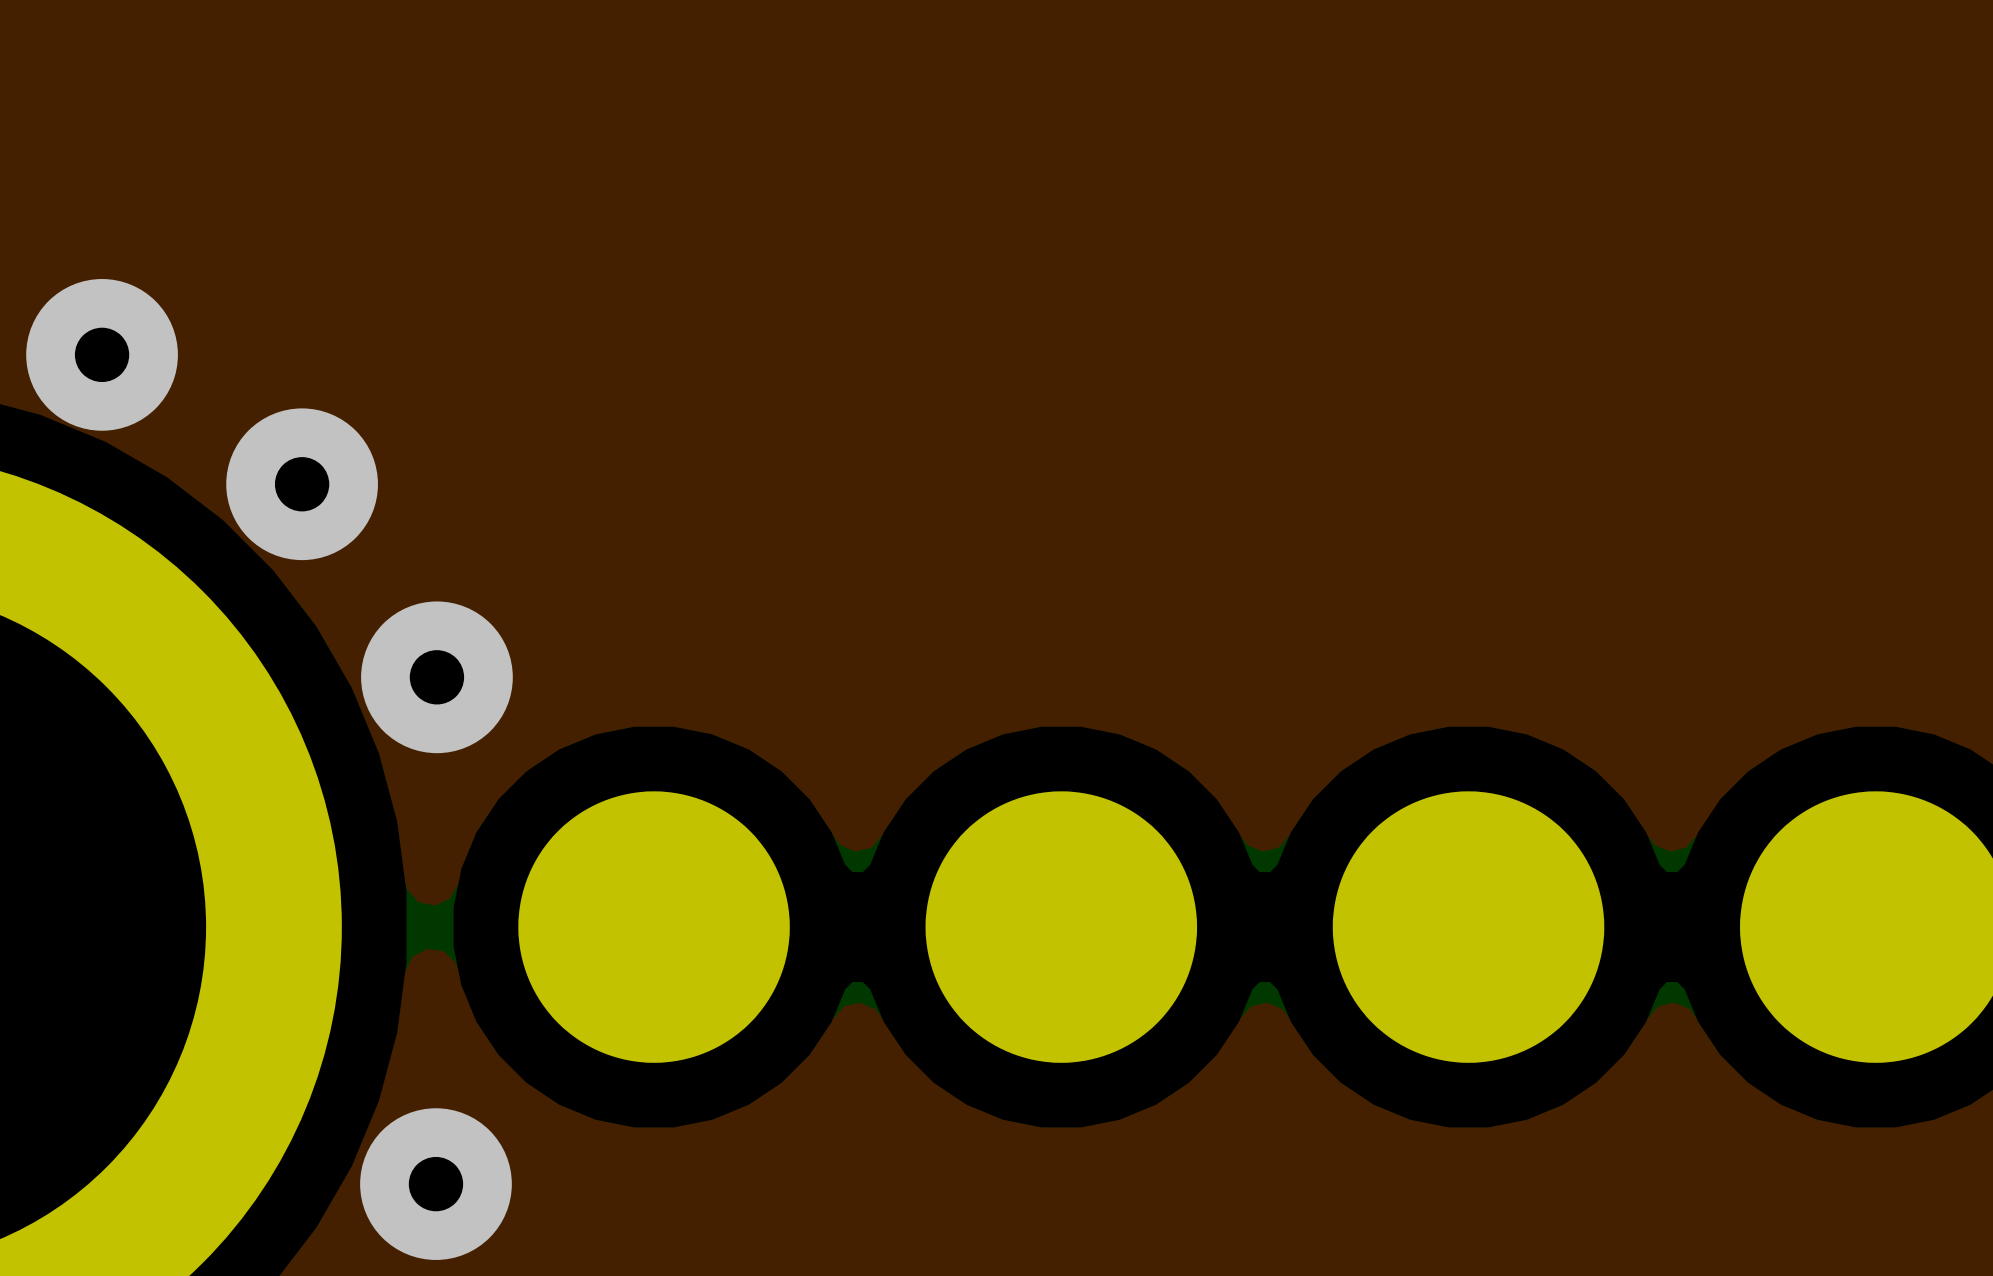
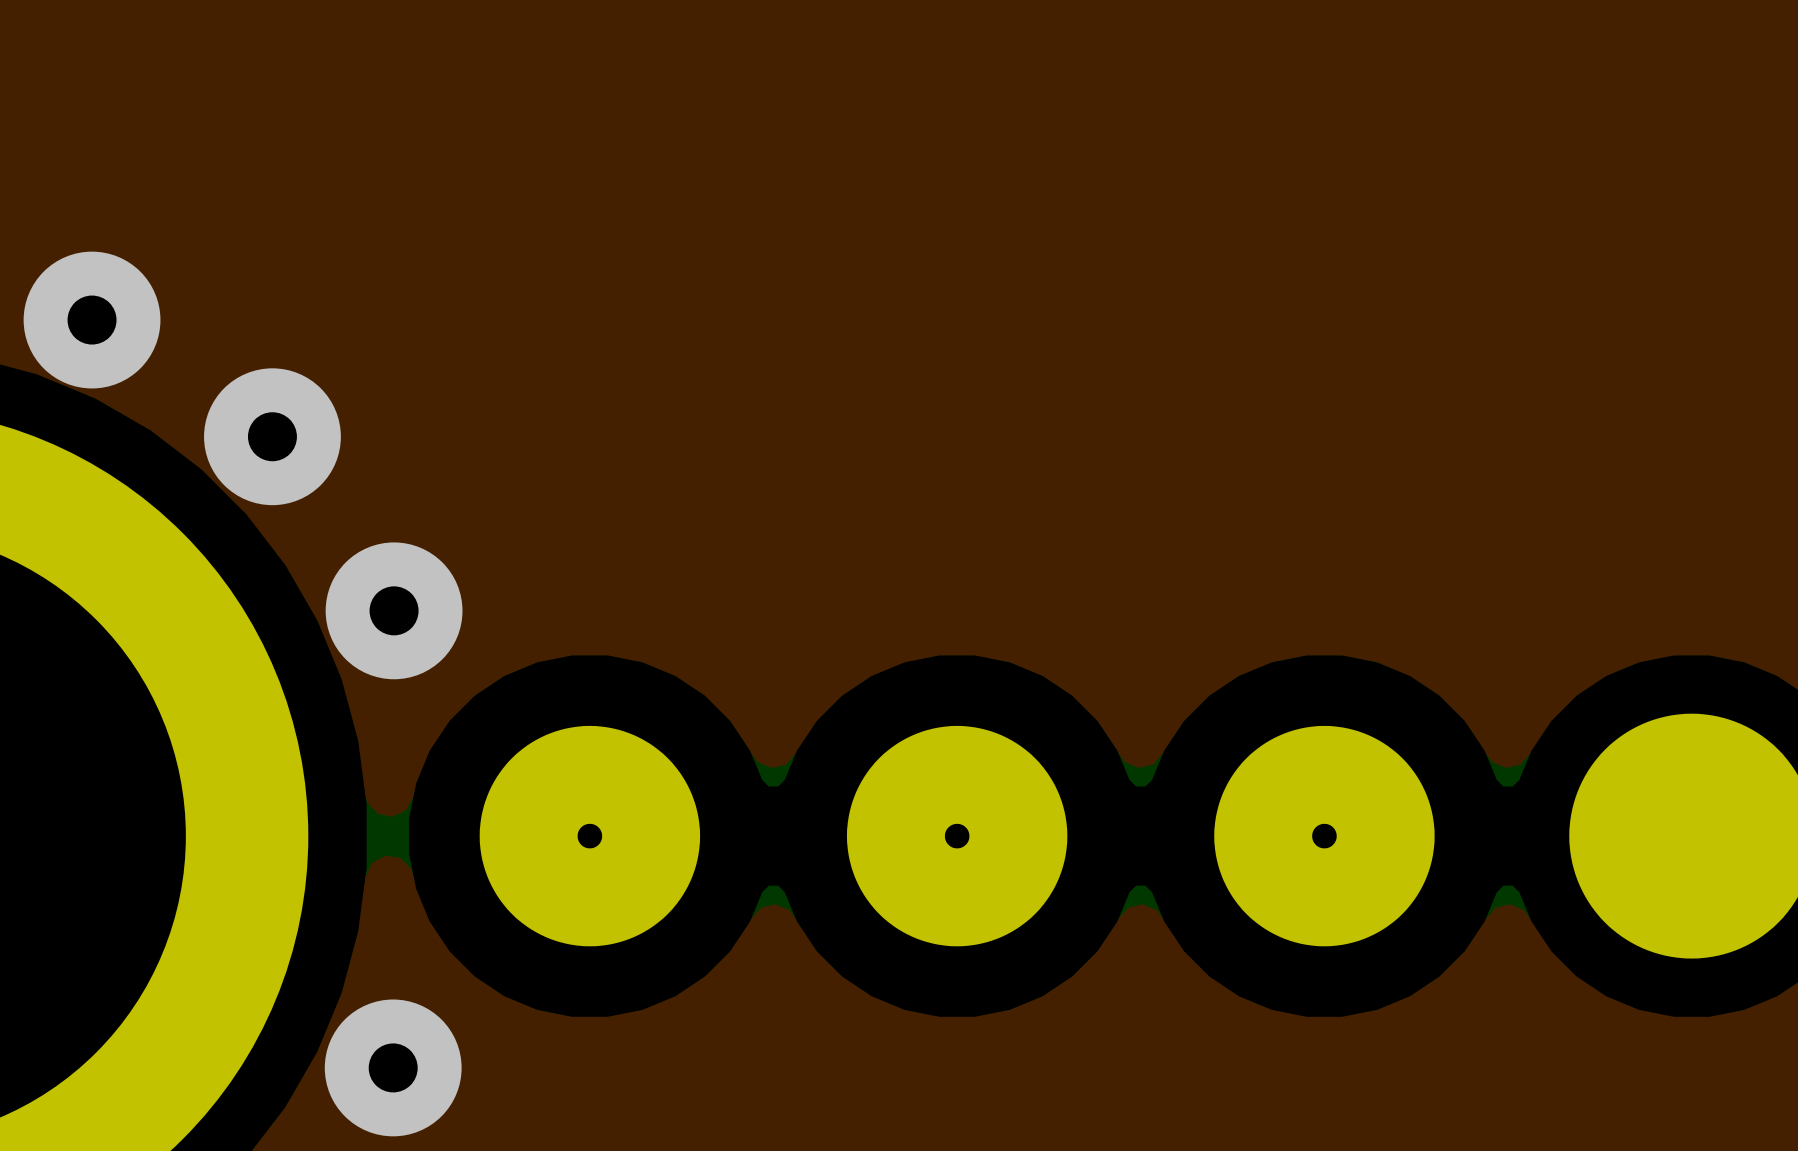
round board edge size: [518, 791, 790, 1063] -> [479, 725, 701, 947]
round board edge size: [925, 791, 1198, 1063] -> [846, 725, 1068, 947]
round board edge size: [1332, 791, 1605, 1063] -> [1214, 725, 1435, 947]

